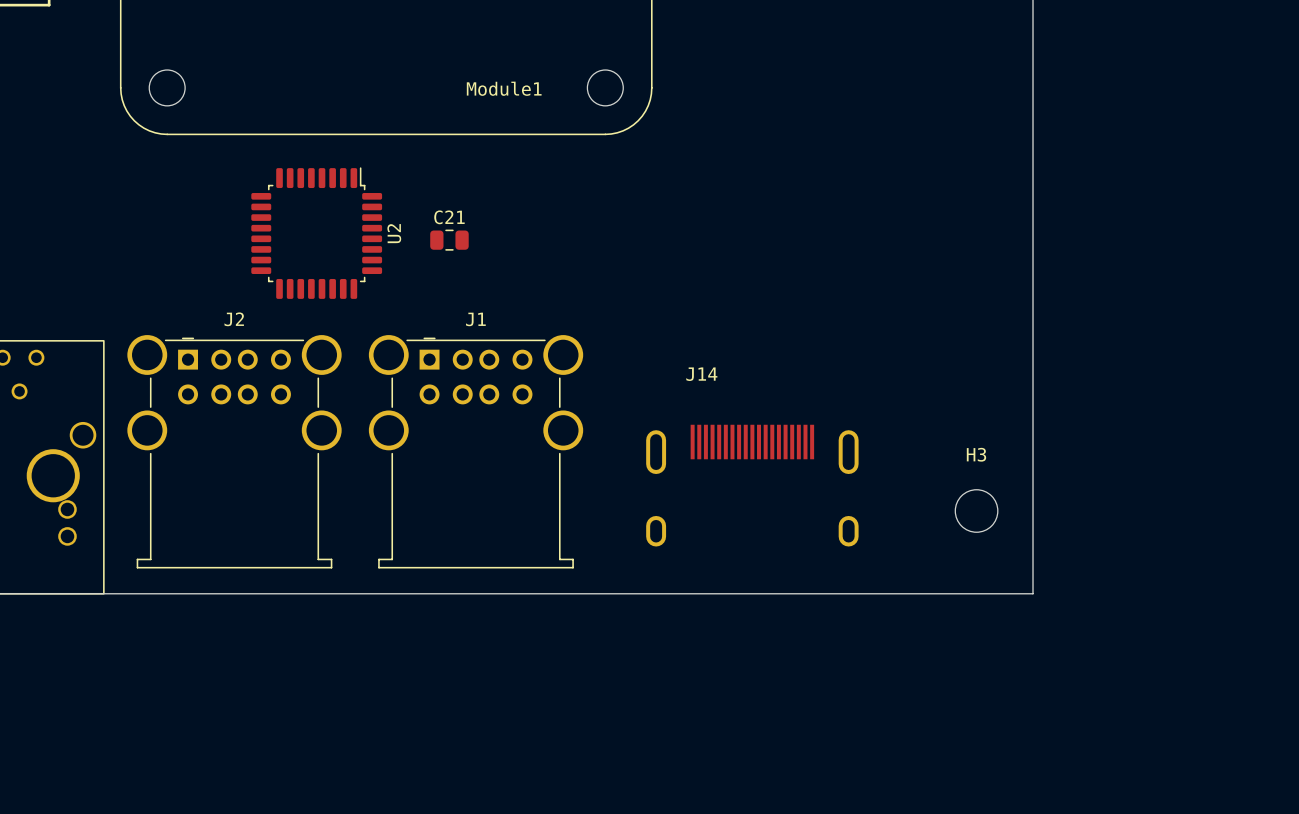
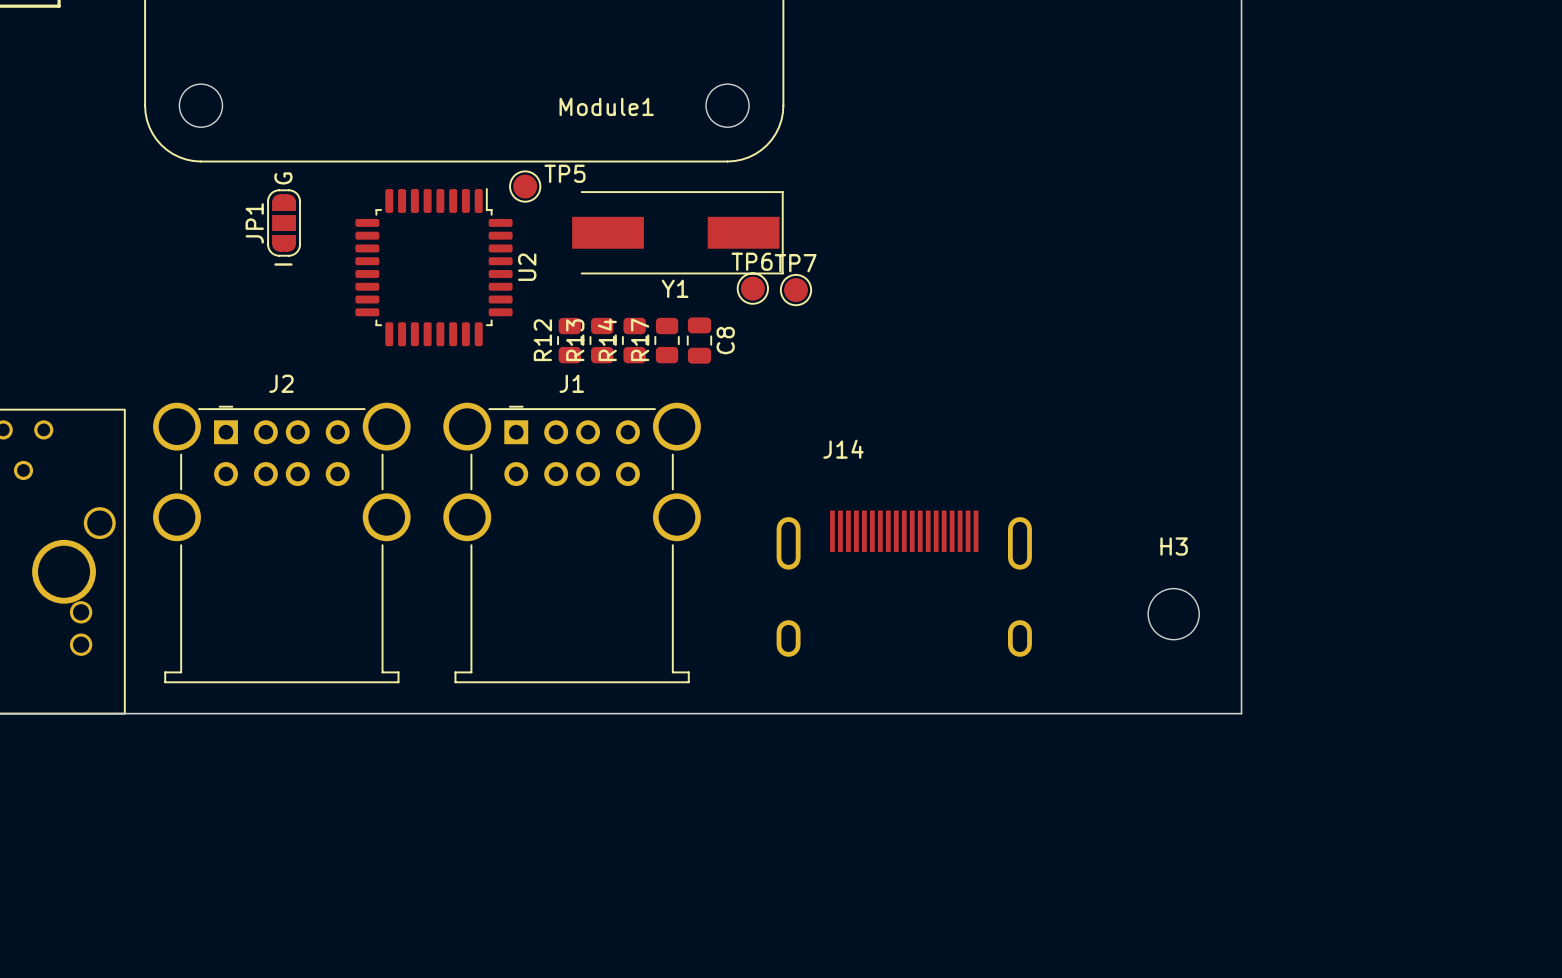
TP5: none -> (525, 186)
JP1: none -> (284, 223)
Y1: none -> (677, 232)
U2 position: (316, 233) -> (434, 267)
C21: (449, 240) -> none
TP6: none -> (752, 288)
TP7: none -> (796, 290)
R12: none -> (569, 340)
R13: none -> (602, 340)
R14: none -> (634, 340)
R17: none -> (667, 340)
C8: none -> (699, 340)

